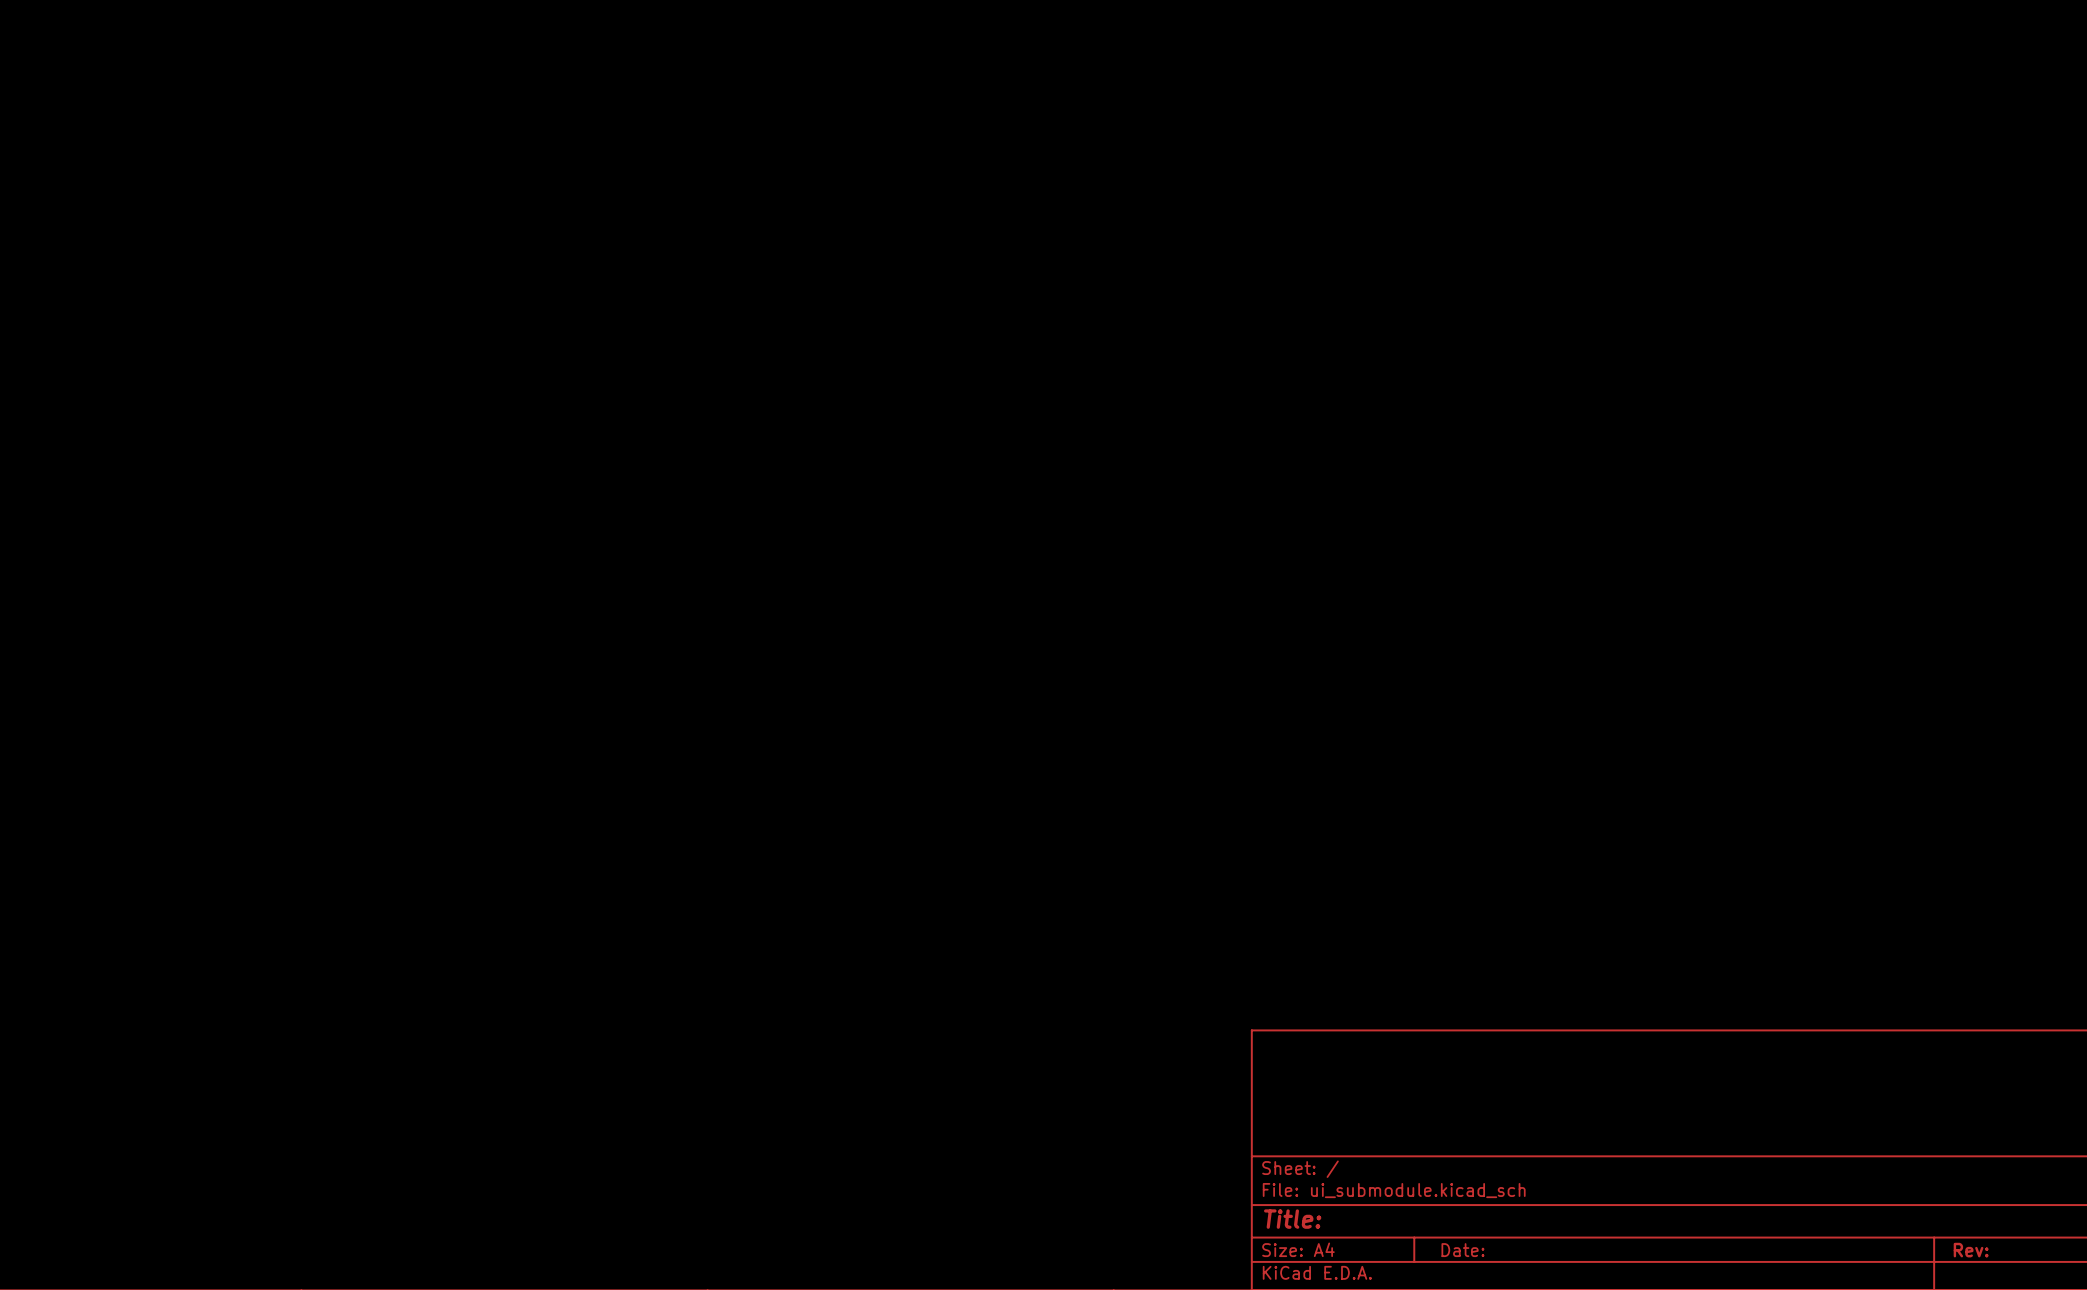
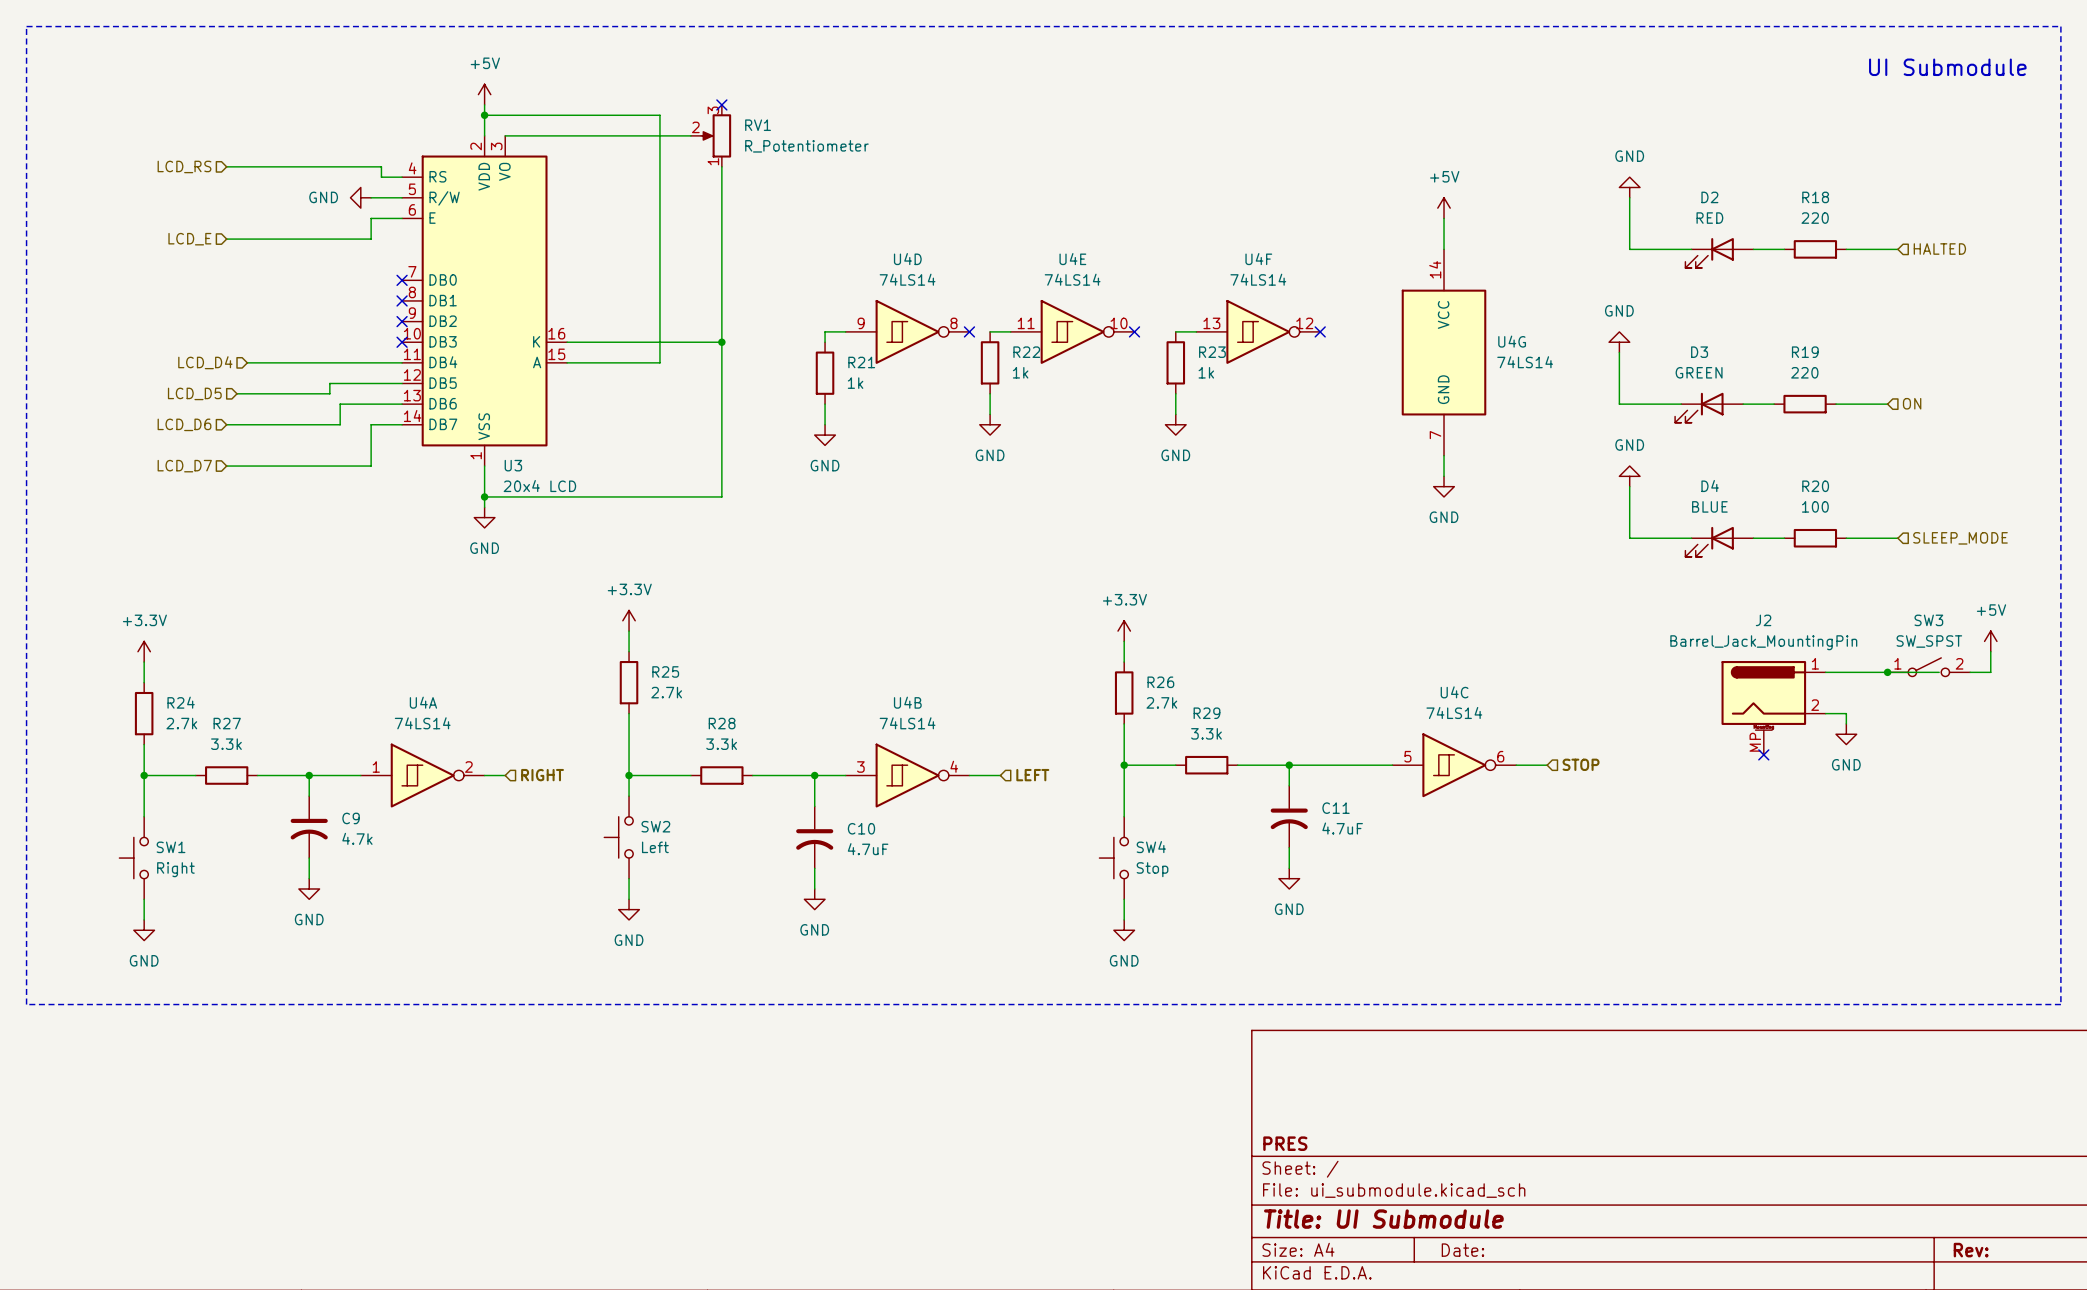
line: none -> (26, 26) (2060, 26) (2060, 1004) (26, 1004) (26, 26)
text: none -> UI Submodule (1947, 67)
power symbol: none -> +5V (484, 94)
wire: none -> (484, 104) (484, 135)
no-connect mark: none -> (721, 104)
wire: none -> (484, 115) (659, 115) (659, 362) (567, 362)
junction: none -> (484, 115)
wire: none -> (505, 135) (690, 135)
RV1: none -> R_Potentiometer (711, 135)
hierarchical label: none -> LCD_RS (184, 166)
wire: none -> (226, 166) (381, 166) (381, 177) (402, 177)
wire: none -> (721, 166) (721, 496) (484, 496)
power symbol: none -> GND (1629, 187)
power symbol: none -> GND (360, 197)
wire: none -> (371, 197) (402, 197)
wire: none -> (1629, 197) (1629, 249) (1691, 249)
power symbol: none -> +5V (1444, 208)
wire: none -> (402, 218) (371, 218) (371, 239) (226, 239)
wire: none -> (1444, 218) (1444, 249)
hierarchical label: none -> LCD_E (189, 239)
wire: none -> (1753, 249) (1784, 249)
R18: none -> 220 (1815, 249)
wire: none -> (1846, 249) (1897, 249)
hierarchical label: none -> HALTED (1939, 249)
D2: none -> RED (1719, 253)
no-connect mark: none -> (402, 280)
no-connect mark: none -> (402, 300)
U3: none -> 20x4 LCD (484, 300)
no-connect mark: none -> (402, 321)
wire: none -> (845, 331) (825, 331) (825, 342)
U4D: none -> 74LS14 (907, 331)
no-connect mark: none -> (969, 331)
wire: none -> (990, 331) (1010, 331)
U4E: none -> 74LS14 (1072, 331)
no-connect mark: none -> (1134, 331)
wire: none -> (1175, 331) (1196, 331)
U4F: none -> 74LS14 (1258, 331)
no-connect mark: none -> (1320, 331)
no-connect mark: none -> (402, 342)
wire: none -> (567, 342) (721, 342)
junction: none -> (721, 342)
power symbol: none -> GND (1619, 342)
U4G: none -> 74LS14 (1444, 352)
wire: none -> (1619, 352) (1619, 404) (1681, 404)
hierarchical label: none -> LCD_D4 (205, 362)
wire: none -> (247, 362) (402, 362)
R22: none -> 1k (990, 362)
R23: none -> 1k (1175, 362)
R21: none -> 1k (825, 373)
wire: none -> (402, 383) (329, 383) (329, 393) (237, 393)
hierarchical label: none -> LCD_D5 (194, 393)
wire: none -> (990, 393) (990, 414)
wire: none -> (1175, 393) (1175, 414)
hierarchical label: none -> ON (1912, 403)
wire: none -> (402, 404) (340, 404) (340, 424) (226, 424)
wire: none -> (825, 404) (825, 424)
wire: none -> (1743, 404) (1774, 404)
R19: none -> 220 (1805, 404)
wire: none -> (1836, 404) (1887, 404)
D3: none -> GREEN (1709, 407)
hierarchical label: none -> LCD_D6 (184, 424)
wire: none -> (402, 424) (371, 424) (371, 466) (226, 466)
power symbol: none -> GND (990, 424)
power symbol: none -> GND (1175, 424)
power symbol: none -> GND (825, 435)
wire: none -> (1444, 455) (1444, 476)
hierarchical label: none -> LCD_D7 (184, 466)
wire: none -> (484, 466) (484, 507)
power symbol: none -> GND (1629, 476)
power symbol: none -> GND (1444, 486)
wire: none -> (1629, 486) (1629, 538) (1691, 538)
junction: none -> (484, 496)
power symbol: none -> GND (484, 517)
wire: none -> (1753, 538) (1784, 538)
R20: none -> 100 (1815, 538)
wire: none -> (1846, 538) (1897, 538)
hierarchical label: none -> SLEEP_MODE (1960, 538)
D4: none -> BLUE (1719, 541)
power symbol: none -> +3.3V (629, 620)
wire: none -> (629, 631) (629, 651)
power symbol: none -> +3.3V (1124, 631)
wire: none -> (1124, 641) (1124, 662)
power symbol: none -> +5V (1990, 641)
power symbol: none -> +3.3V (144, 651)
wire: none -> (1990, 651) (1990, 672) (1970, 672)
wire: none -> (144, 662) (144, 682)
SW3: none -> SW_SPST (1928, 667)
wire: none -> (1825, 672) (1939, 672)
junction: none -> (1887, 672)
R25: none -> 2.7k (629, 682)
R26: none -> 2.7k (1124, 692)
J2: none -> Barrel_Jack_MountingPin (1773, 707)
R24: none -> 2.7k (144, 713)
wire: none -> (629, 713) (629, 796)
wire: none -> (1825, 713) (1846, 713) (1846, 723)
wire: none -> (1124, 723) (1124, 816)
power symbol: none -> GND (1846, 734)
wire: none -> (144, 744) (144, 816)
no-connect mark: none -> (1763, 754)
hierarchical label: none -> STOP (1581, 764)
wire: none -> (1124, 765) (1175, 765)
junction: none -> (1124, 765)
R29: none -> 3.3k (1206, 765)
wire: none -> (1237, 765) (1392, 765)
wire: none -> (1289, 765) (1289, 785)
junction: none -> (1289, 765)
U4C: none -> 74LS14 (1454, 765)
wire: none -> (1516, 765) (1547, 765)
wire: none -> (144, 775) (195, 775)
junction: none -> (144, 775)
R27: none -> 3.3k (226, 775)
wire: none -> (257, 775) (360, 775)
wire: none -> (309, 775) (309, 796)
junction: none -> (309, 775)
U4A: none -> 74LS14 (422, 775)
wire: none -> (484, 775) (505, 775)
hierarchical label: none -> RIGHT (542, 775)
wire: none -> (629, 775) (690, 775)
junction: none -> (629, 775)
R28: none -> 3.3k (721, 775)
wire: none -> (752, 775) (845, 775)
wire: none -> (814, 775) (814, 806)
junction: none -> (814, 775)
U4B: none -> 74LS14 (907, 775)
wire: none -> (969, 775) (1000, 775)
hierarchical label: none -> LEFT (1032, 775)
C11: none -> 4.7uF (1289, 816)
C9: none -> 4.7k (309, 827)
SW2: none -> Left (618, 837)
C10: none -> 4.7uF (814, 837)
wire: none -> (1289, 847) (1289, 868)
SW1: none -> Right (133, 858)
wire: none -> (309, 858) (309, 878)
SW4: none -> Stop (1113, 858)
wire: none -> (814, 868) (814, 888)
wire: none -> (629, 878) (629, 899)
power symbol: none -> GND (1289, 878)
power symbol: none -> GND (309, 888)
wire: none -> (144, 899) (144, 919)
power symbol: none -> GND (814, 899)
wire: none -> (1124, 899) (1124, 919)
power symbol: none -> GND (629, 909)
power symbol: none -> GND (144, 930)
power symbol: none -> GND (1124, 930)
title block: none -> PRES (1285, 1143)
title block: Title: (1292, 1219) -> Title: UI Submodule (1383, 1219)

